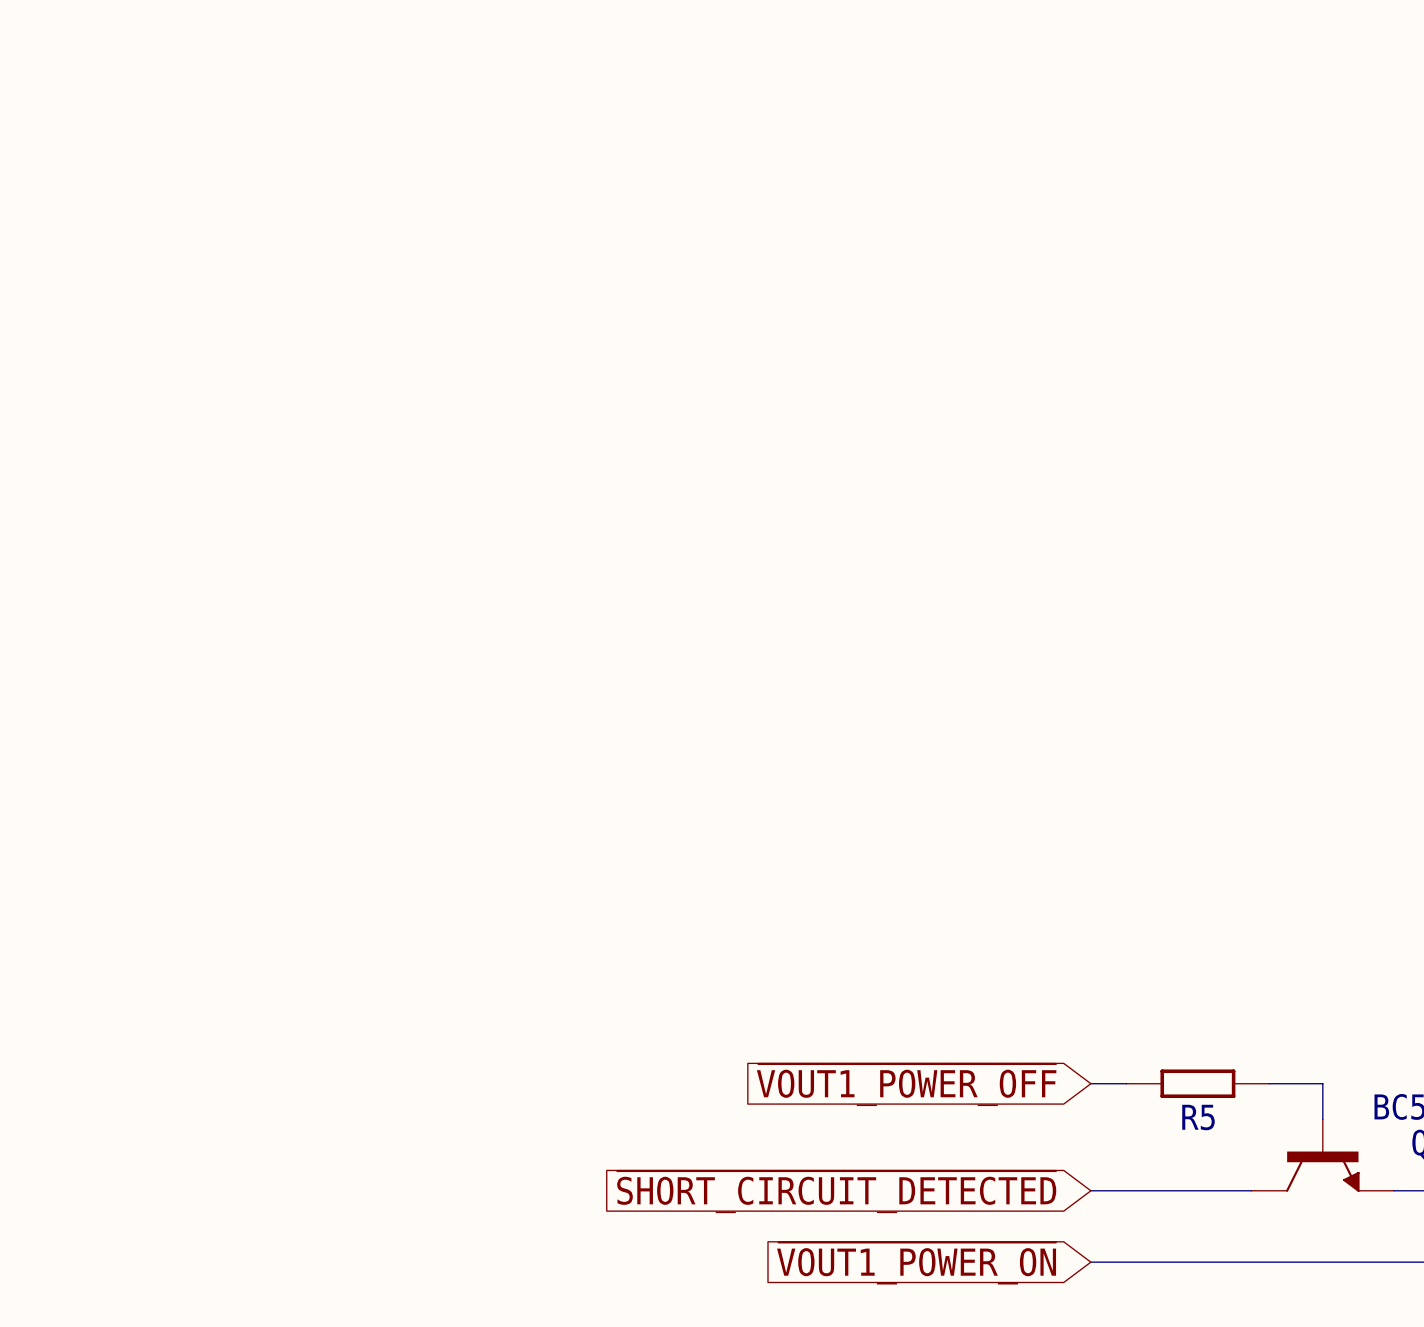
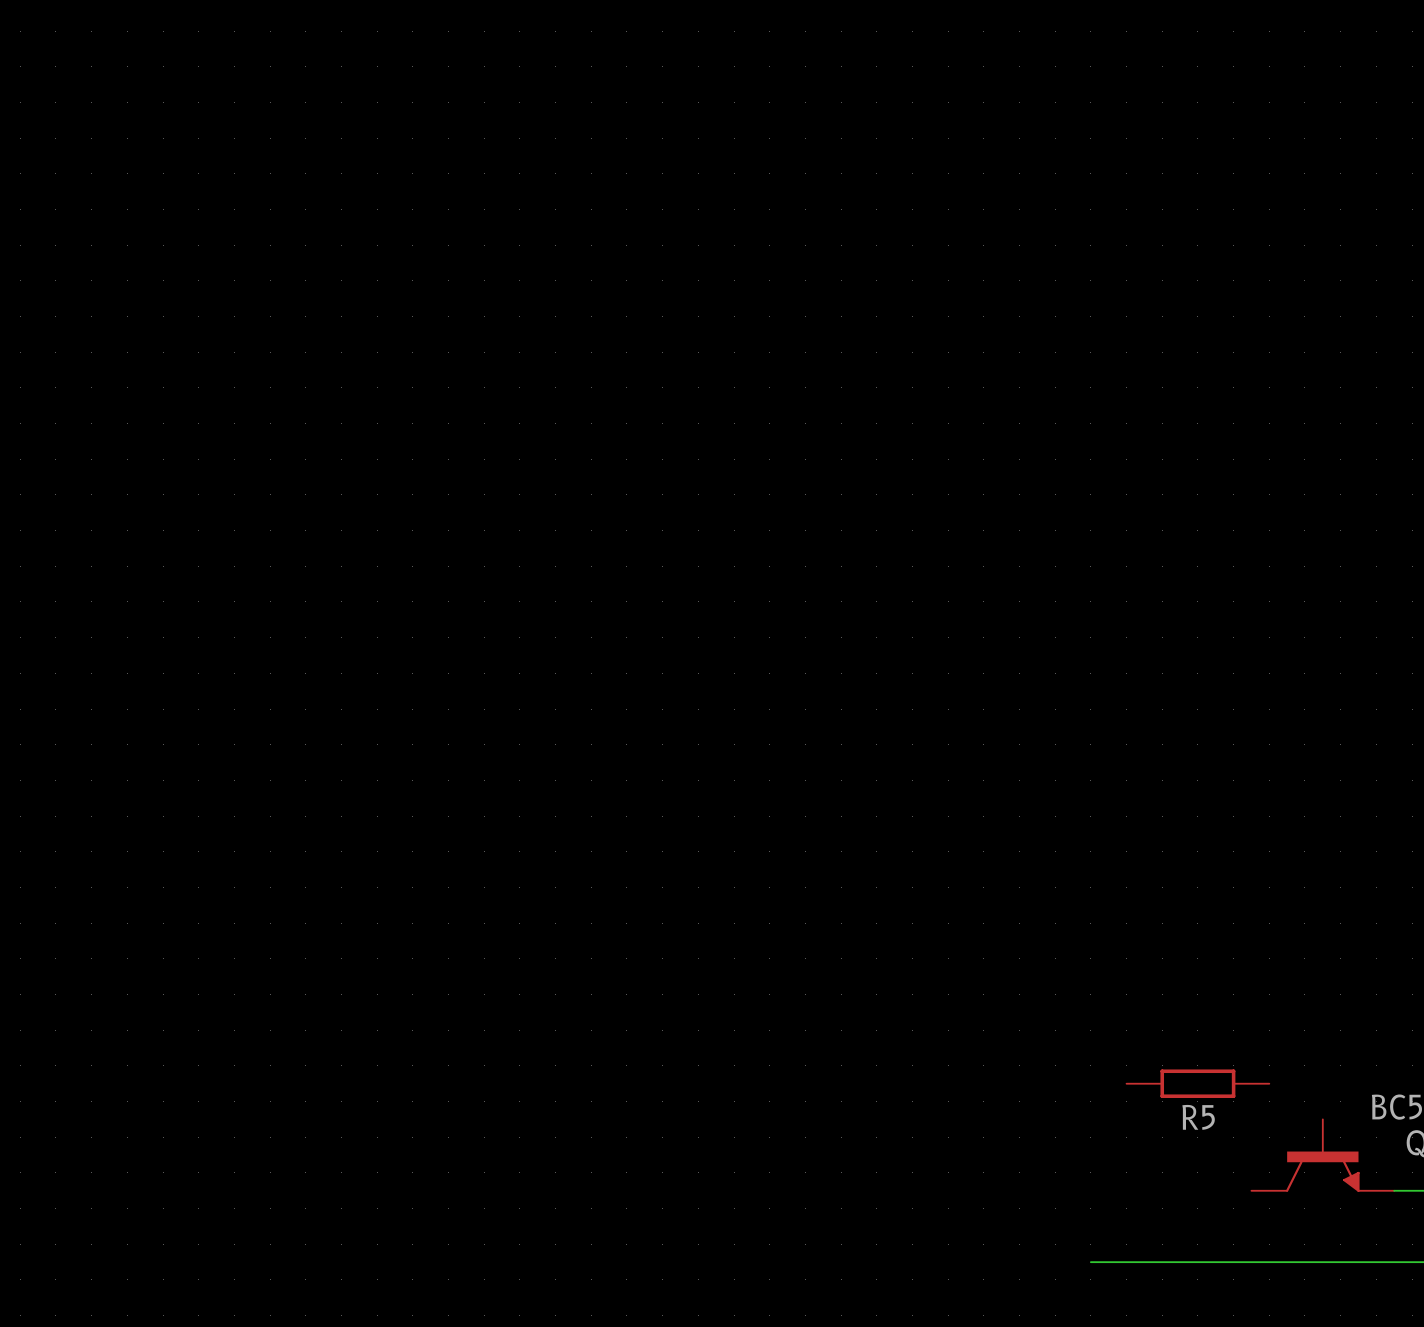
wire: (1090, 1083) (1126, 1083) -> none
wire: (1269, 1083) (1322, 1083) (1322, 1119) -> none
global label: ~{VOUT1_POWER_OFF} (906, 1084) -> none
wire: (1090, 1190) (1251, 1190) -> none
global label: ~{SHORT_CIRCUIT_DETECTED} (836, 1192) -> none
global label: ~{VOUT1_POWER_ON} (916, 1263) -> none

